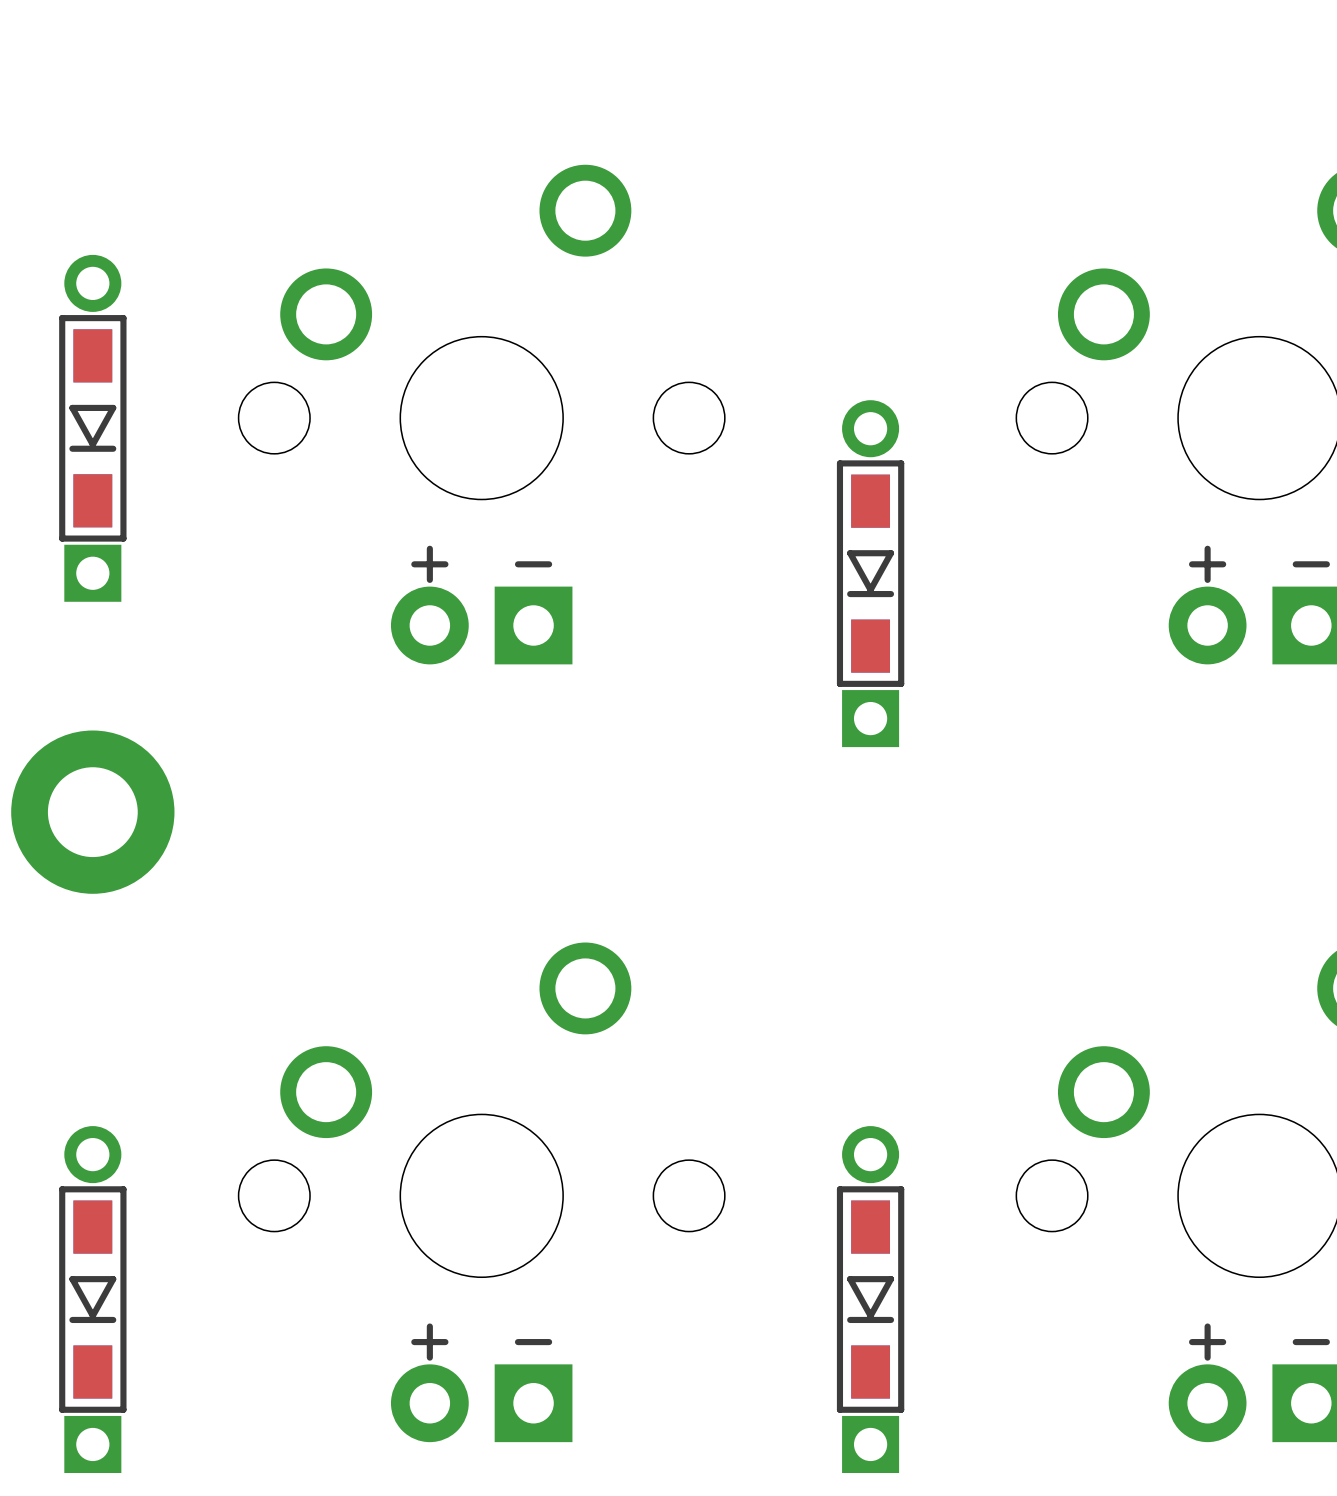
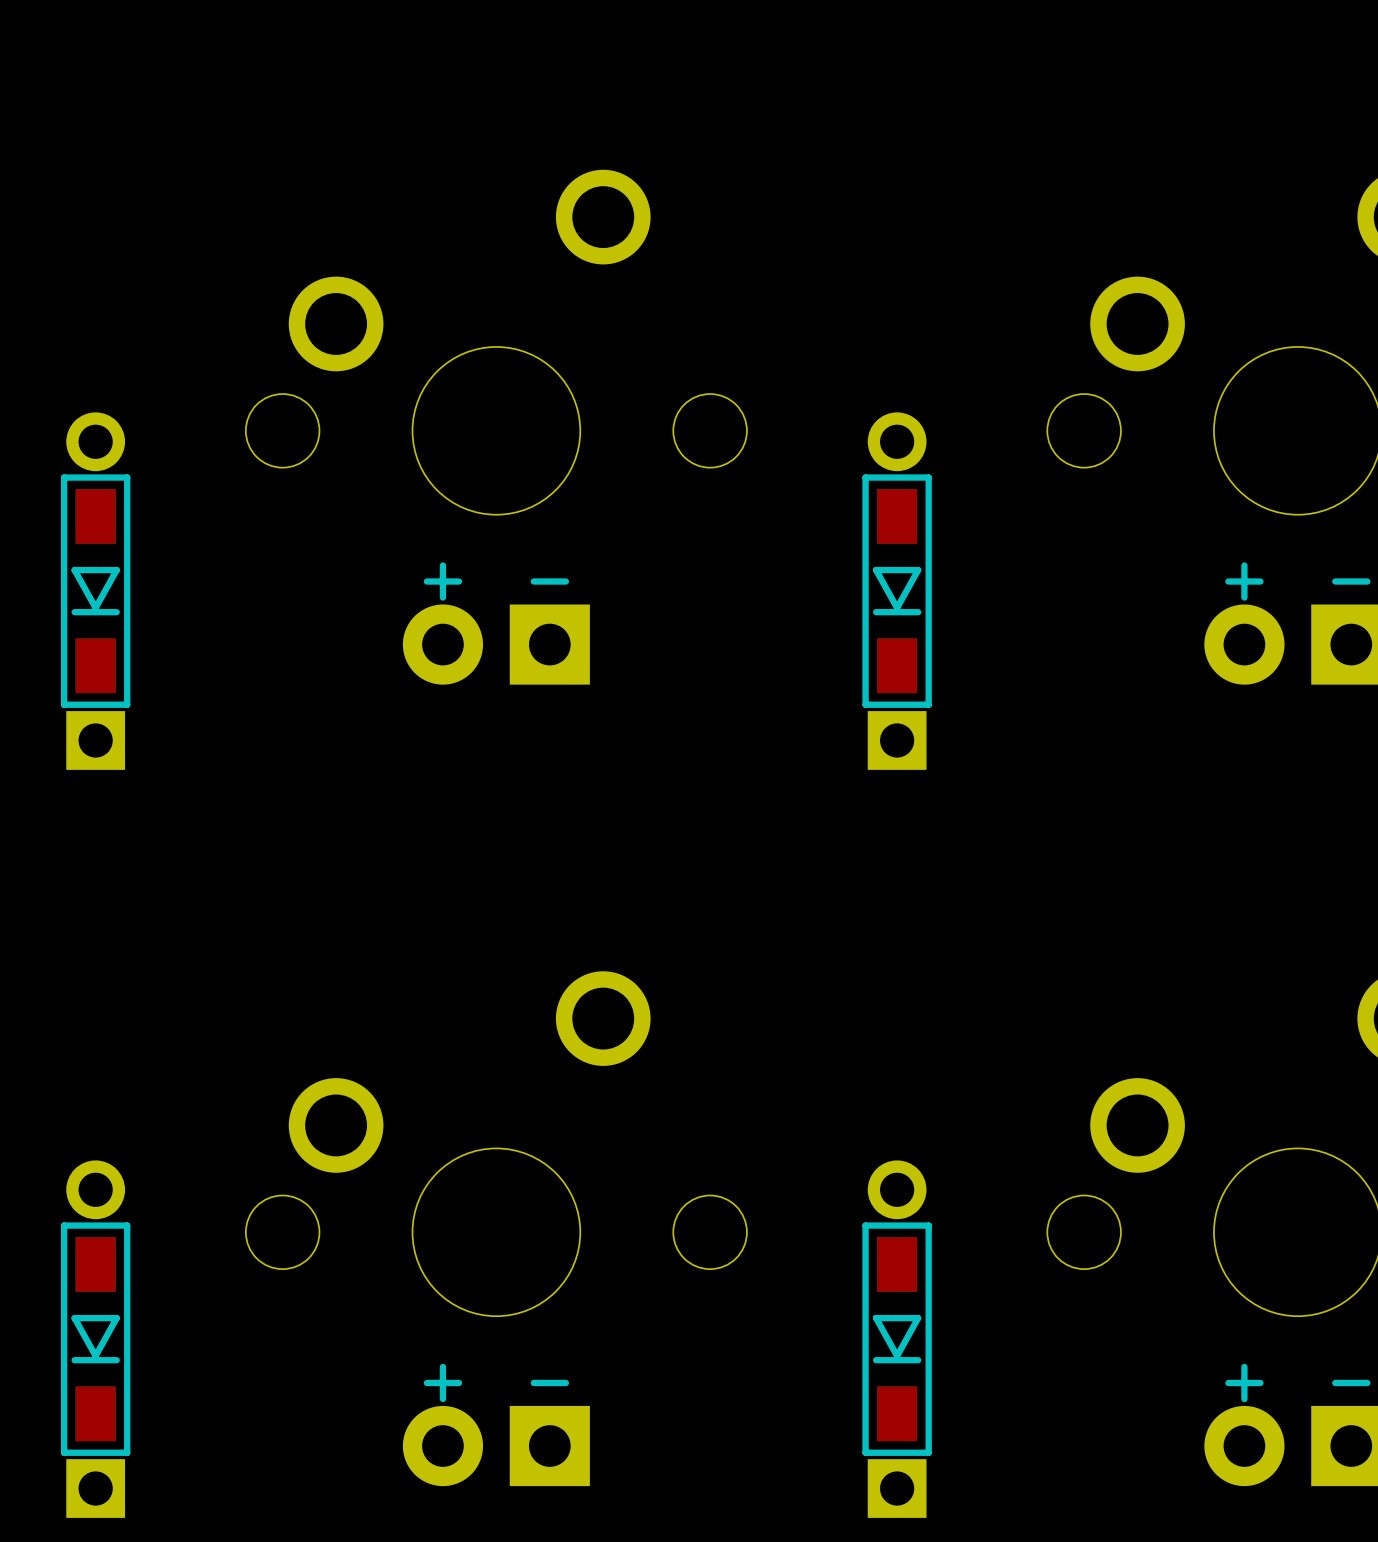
part position: (92, 428) -> (95, 591)
part: (92, 812) -> none

